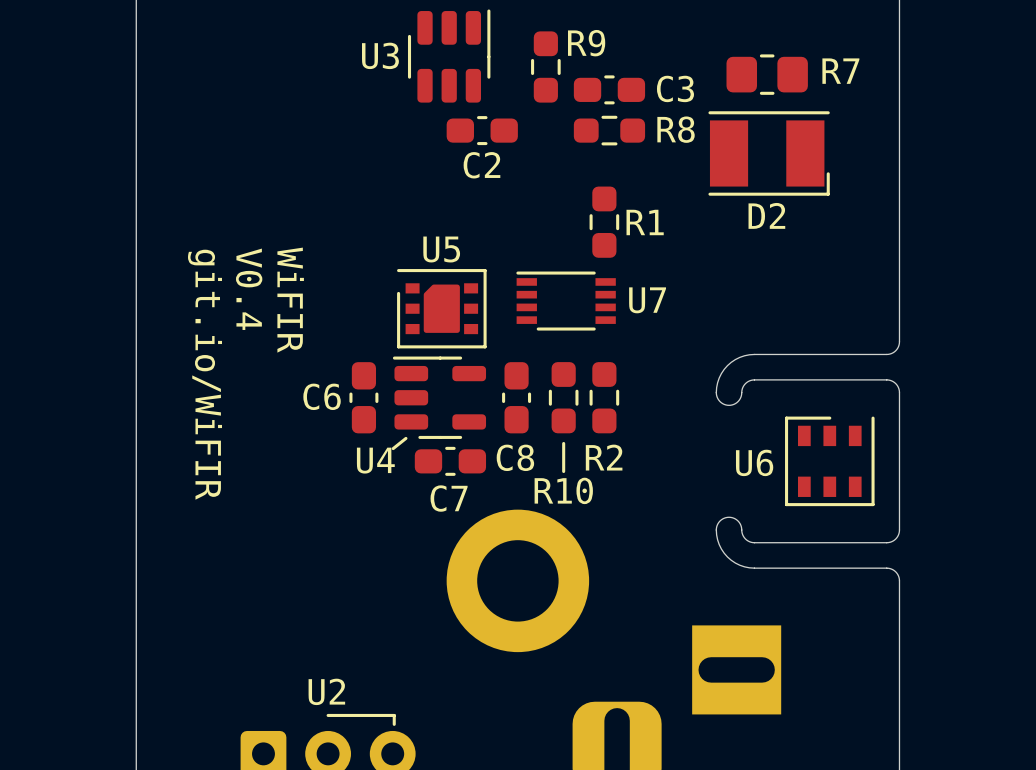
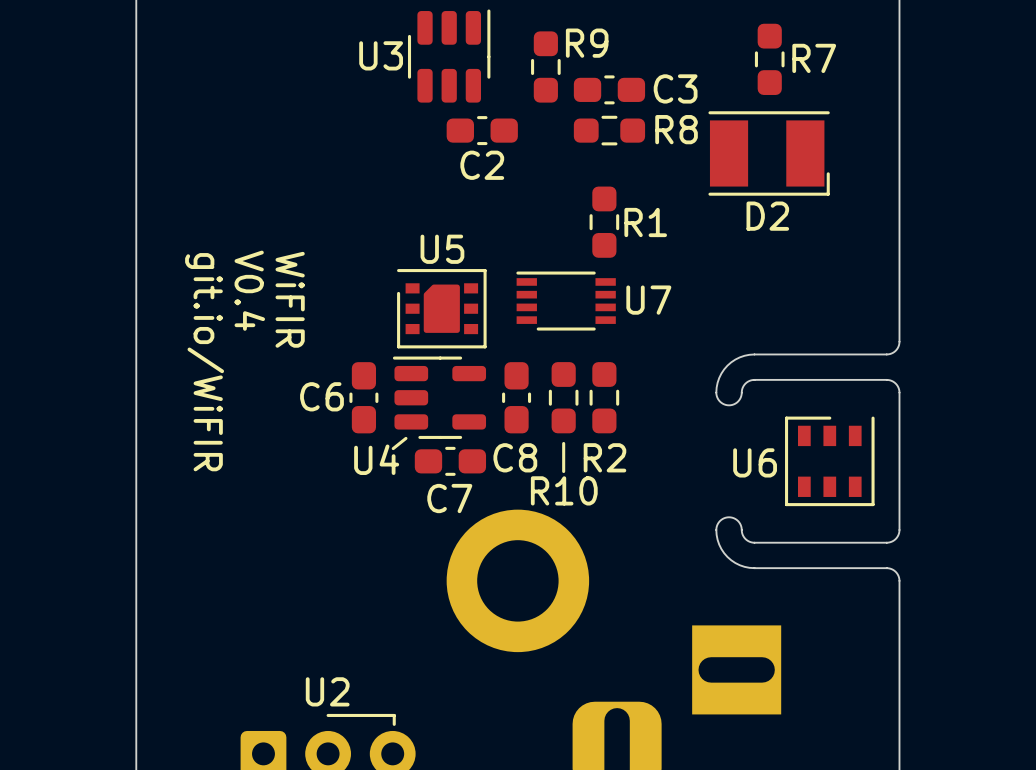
R7 footprint: [726, 54, 808, 95] -> [754, 23, 785, 95]

